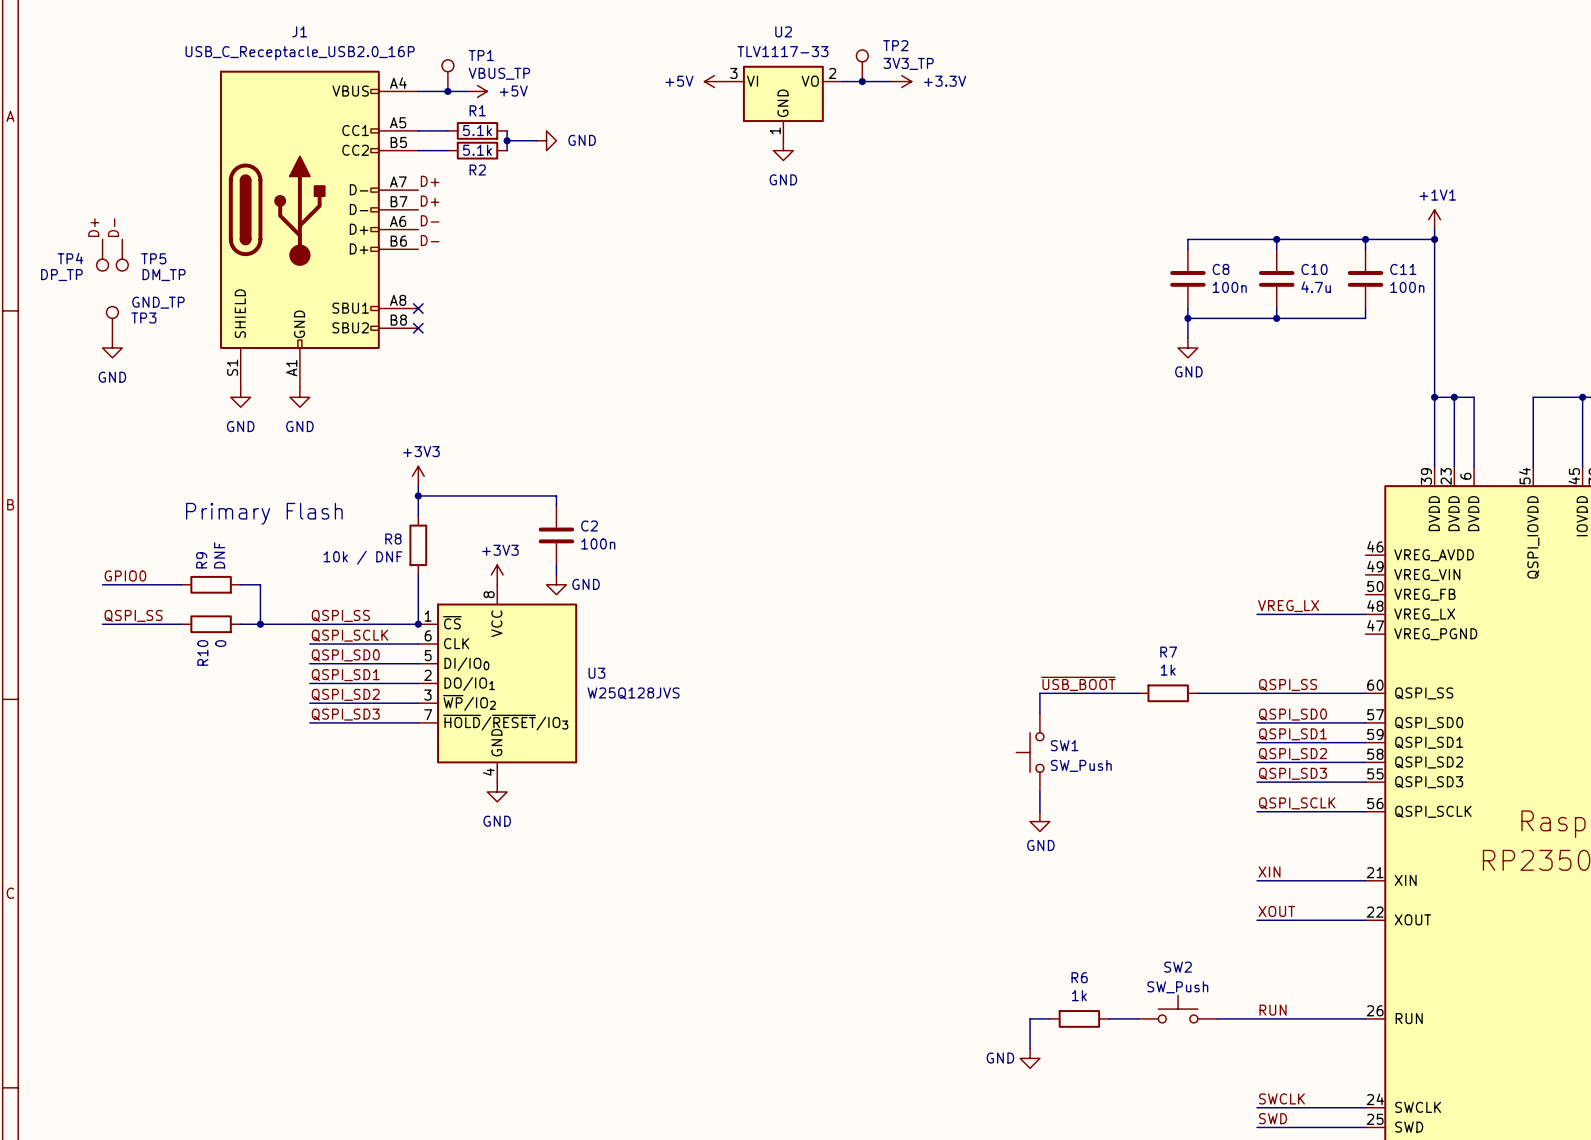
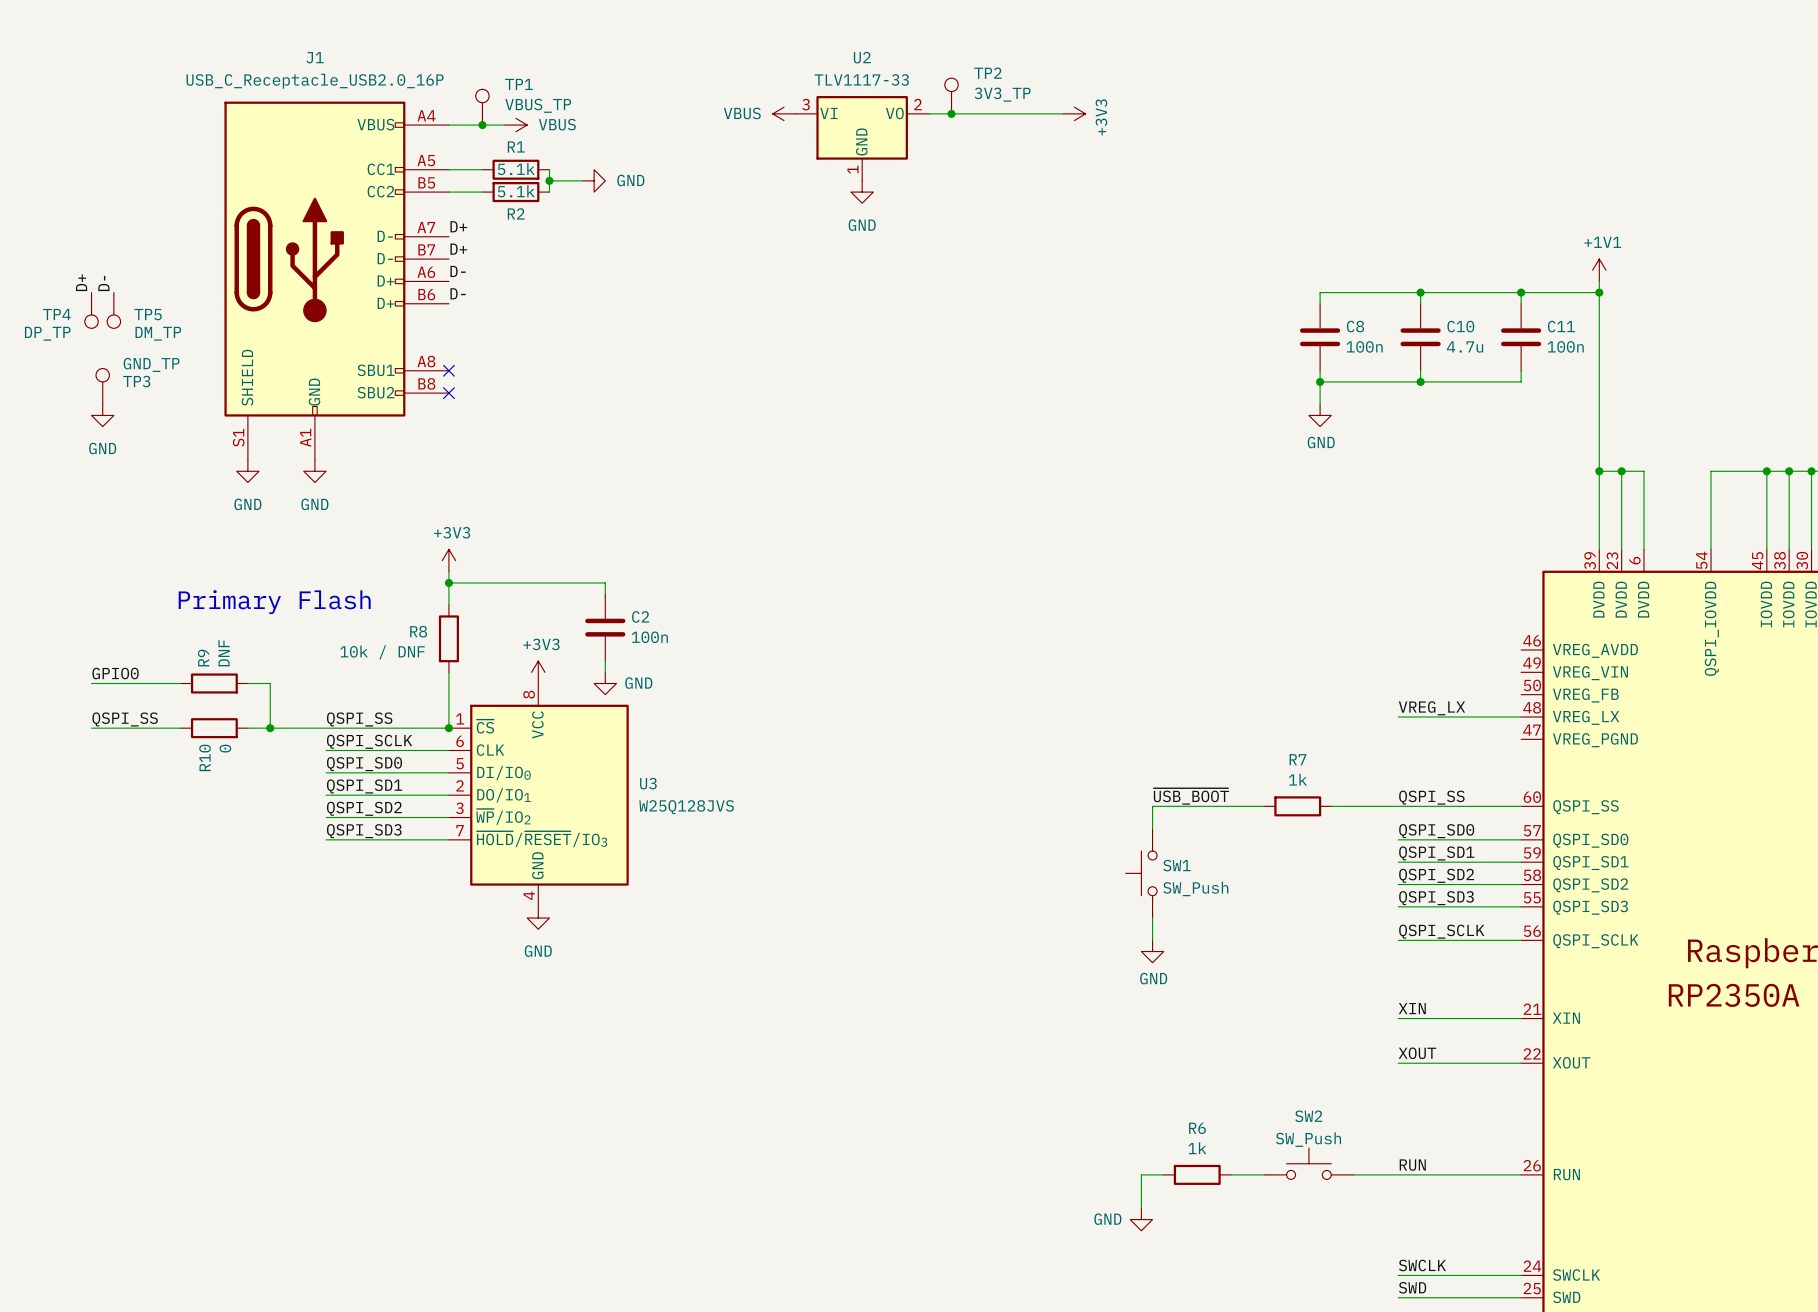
power symbol: +5V (714, 81) -> VBUS (784, 113)
wire: none -> (985, 113) (1063, 113)
power symbol: +3.3V (901, 81) -> none
power symbol: none -> +3V3 (1074, 113)
power symbol: +5V (477, 91) -> VBUS (515, 125)

